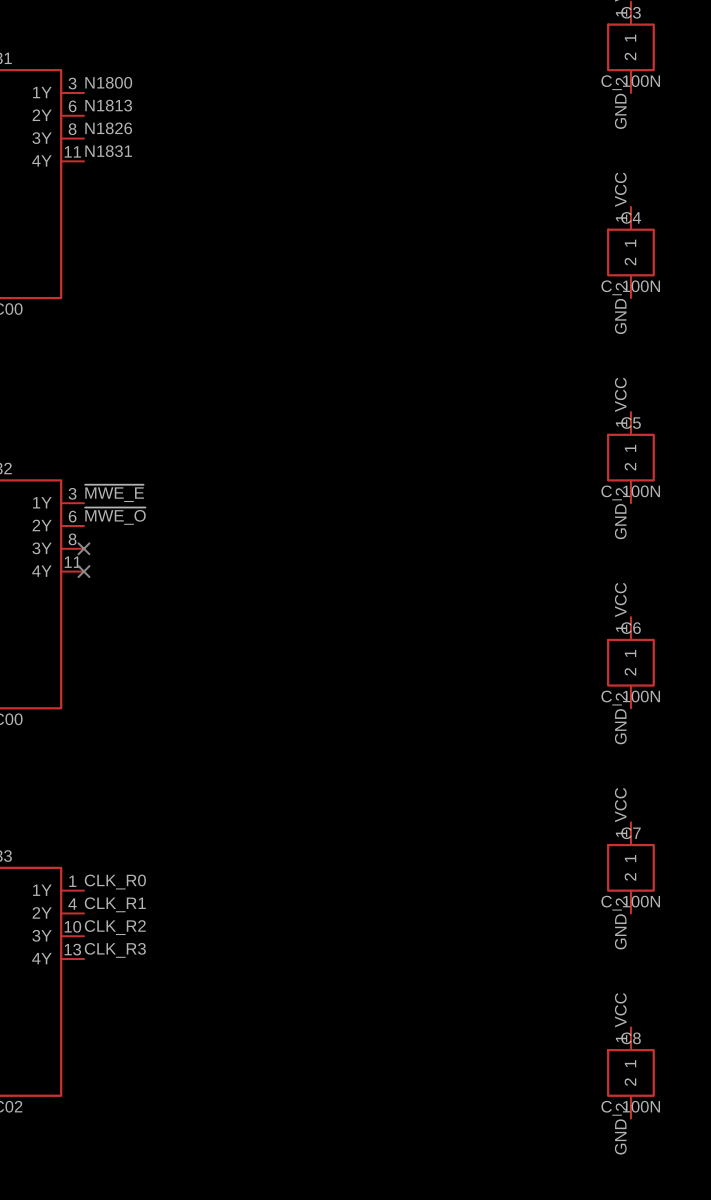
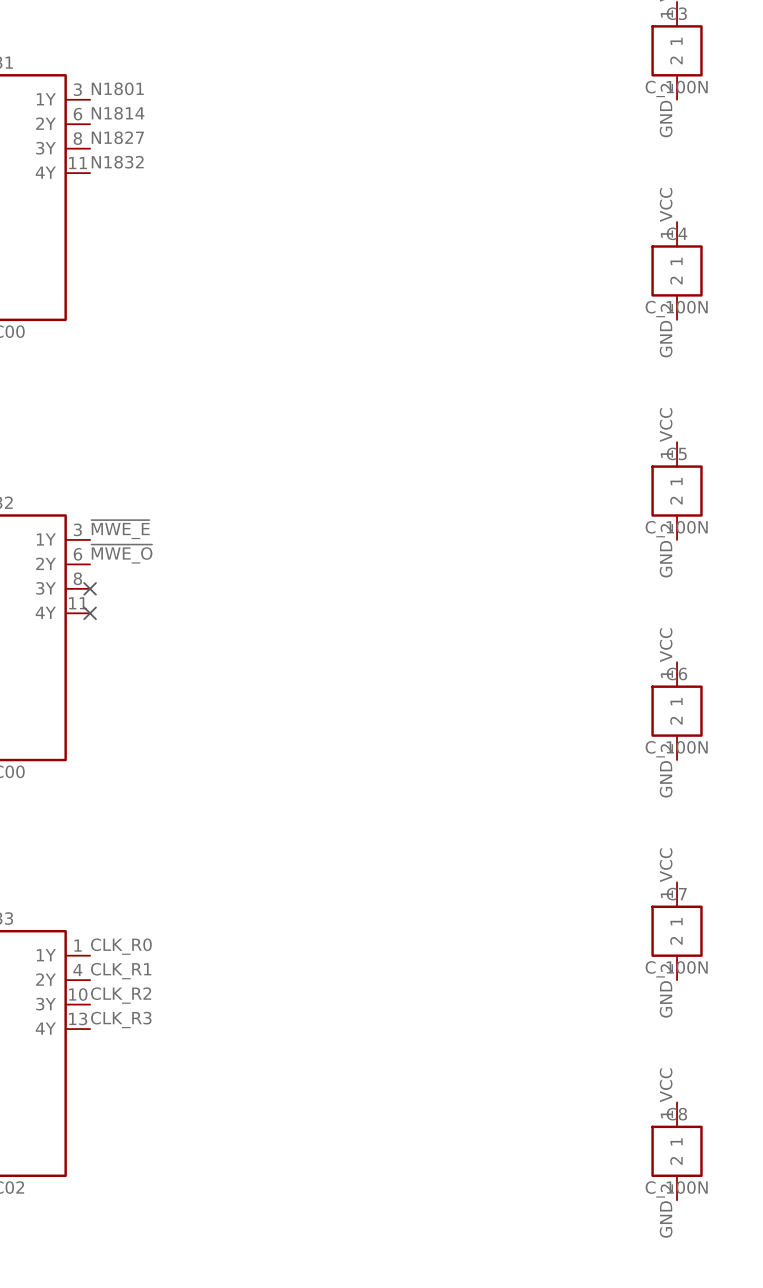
label: N1800 (108, 82) -> N1801 (117, 88)
label: N1813 (108, 105) -> N1814 (118, 113)
label: N1826 (108, 128) -> N1827 (117, 137)
label: N1831 (108, 151) -> N1832 (117, 162)

